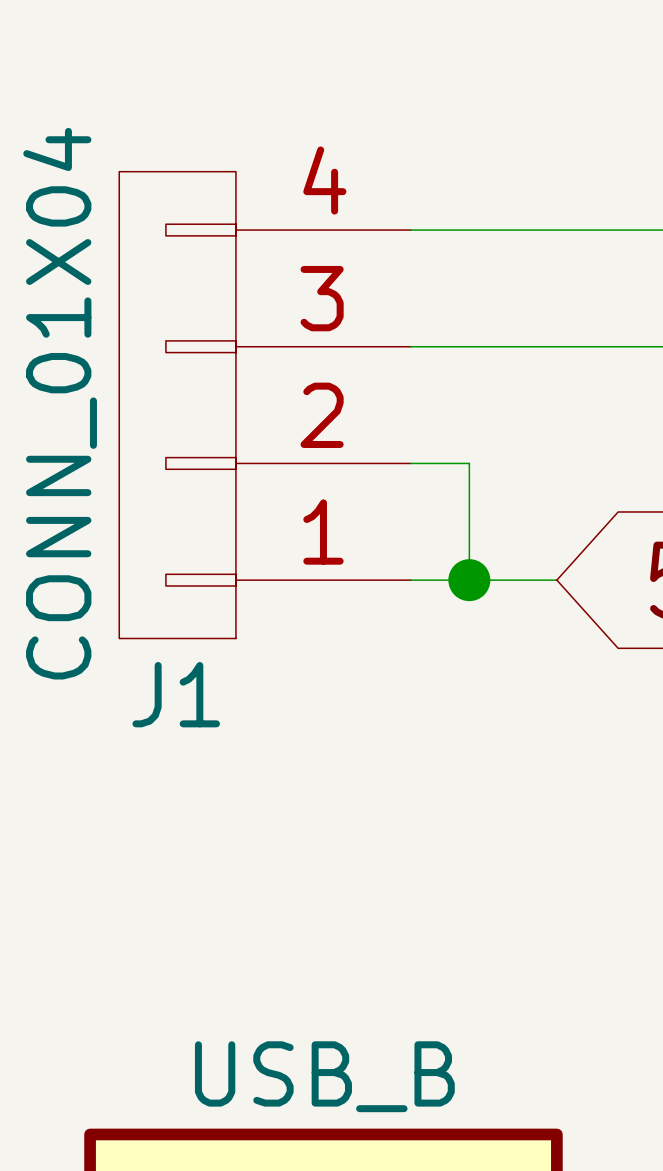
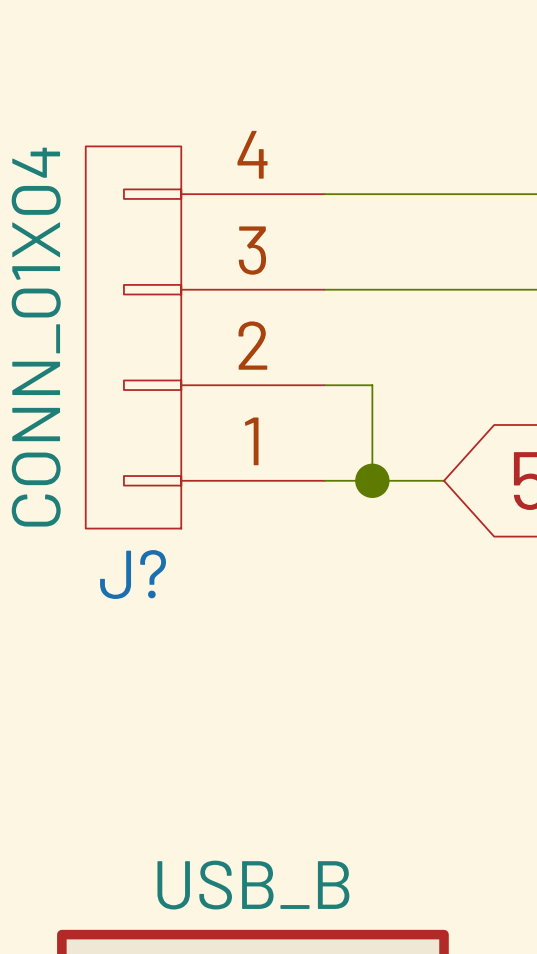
J1 name: J1 (176, 694) -> J? (133, 574)

